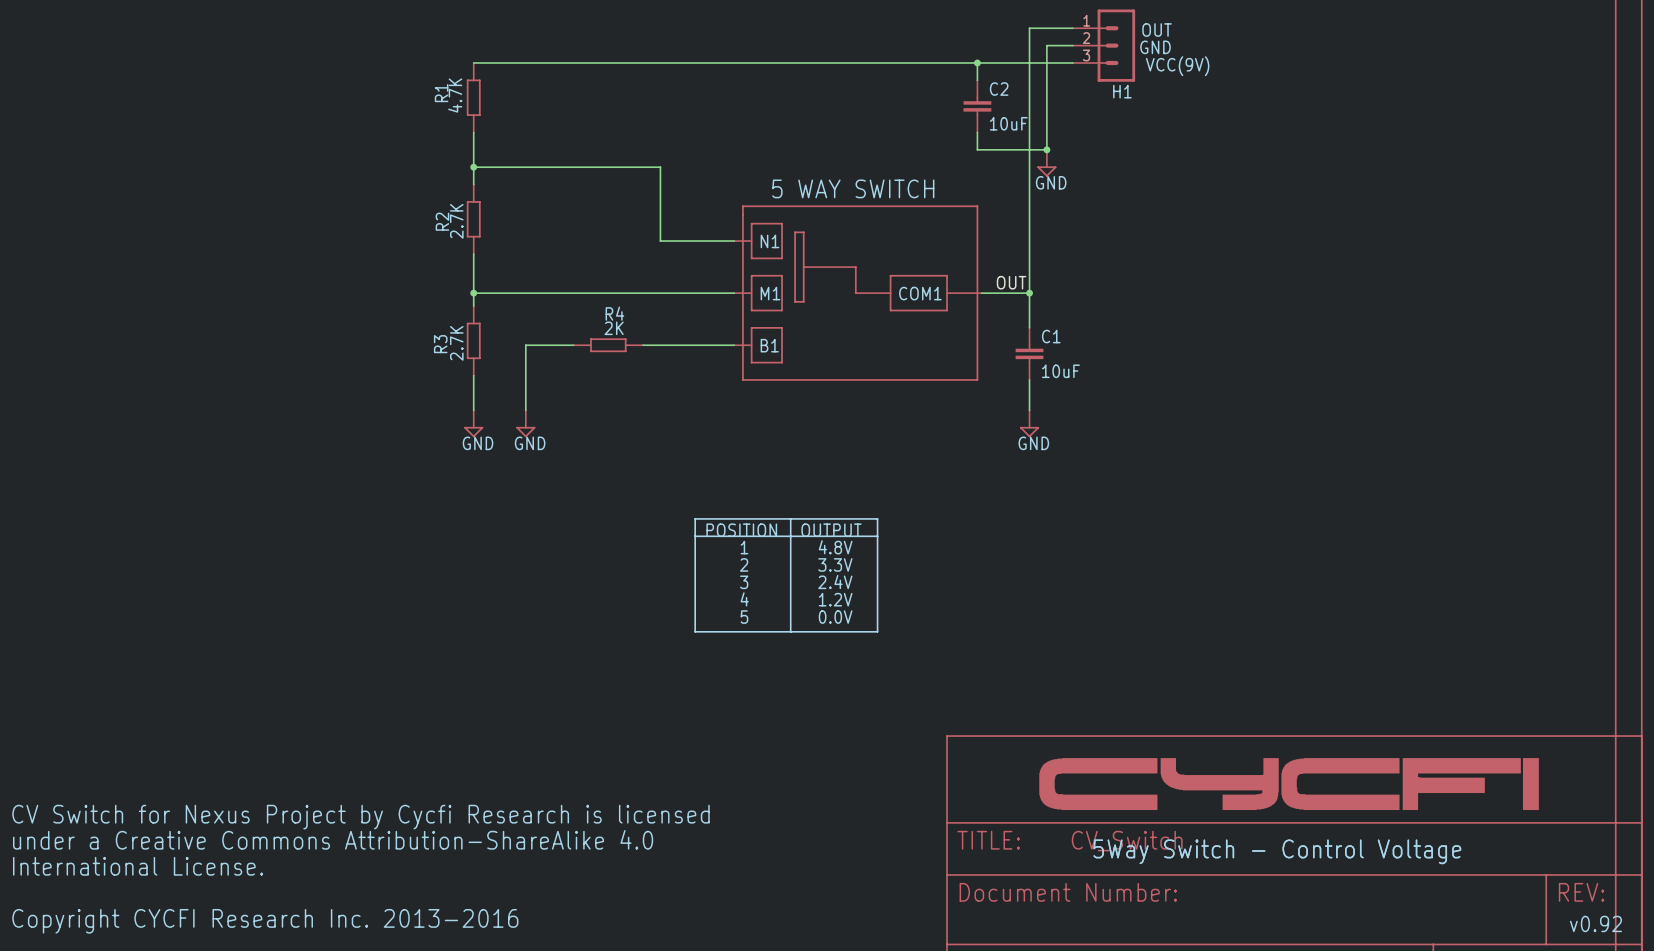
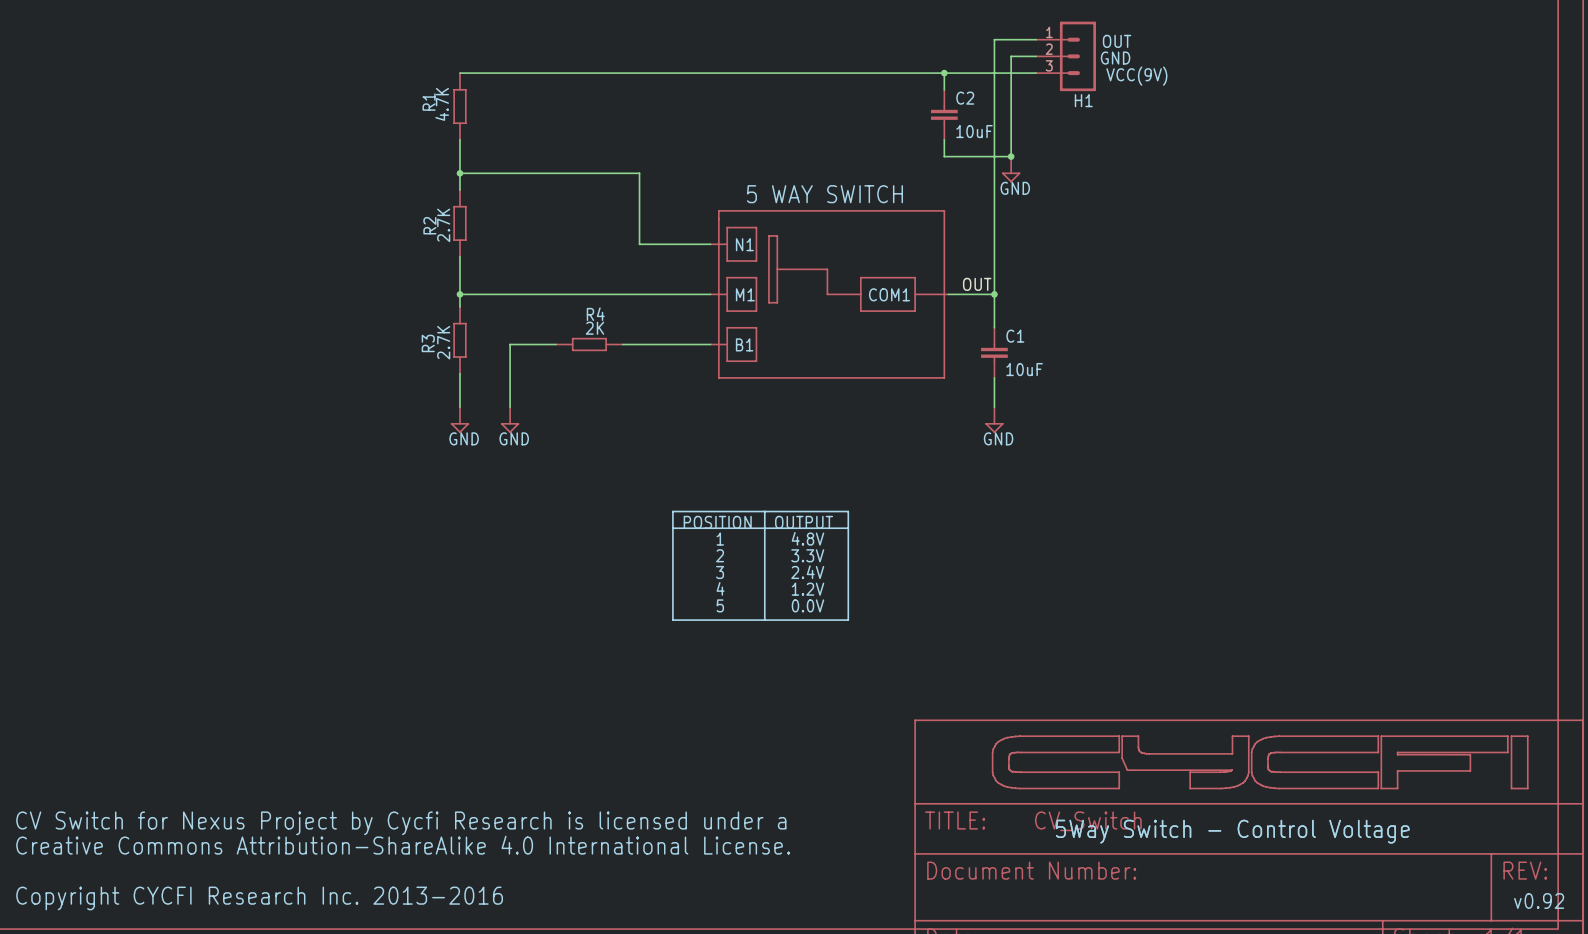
line: none -> (1122, 736) (1138, 736) (1139, 750) (1149, 753) (1232, 753) (1232, 736) (1248, 736) (1248, 775) (1242, 783) (1233, 787) (1190, 788) (1190, 772) (1223, 772) (1232, 770) (1127, 770) (1122, 758) (1122, 736)
line: none -> (1381, 736) (1507, 736) (1507, 752) (1397, 752) (1397, 754) (1470, 754) (1470, 770) (1397, 770) (1397, 788) (1381, 788) (1381, 736)
line: none -> (1511, 736) (1527, 736) (1527, 788) (1511, 788) (1511, 736)
drawing: [1039, 758, 1539, 811] -> none
line: none -> (1009, 767) (1009, 756) (1012, 752) (1119, 752) (1119, 736) (1015, 736) (998, 741) (992, 752) (993, 775) (998, 783) (1007, 787) (1119, 788) (1119, 772) (1012, 771) (1009, 767)
line: none -> (1268, 767) (1268, 756) (1271, 752) (1378, 752) (1378, 736) (1274, 736) (1257, 741) (1251, 752) (1252, 775) (1257, 783) (1266, 787) (1378, 788) (1378, 772) (1271, 771) (1268, 767)
text: CV Switch for Nexus Project by Cycfi Research is licensed (360, 817) -> none
text: under a Creative Commons Attribution-ShareAlike 4.0 (333, 839) -> CV Switch for Nexus Project by Cycfi Research is licensed under a (401, 823)
text: International License. (138, 866) -> Creative Commons Attribution-ShareAlike 4.0 International License. (403, 845)

